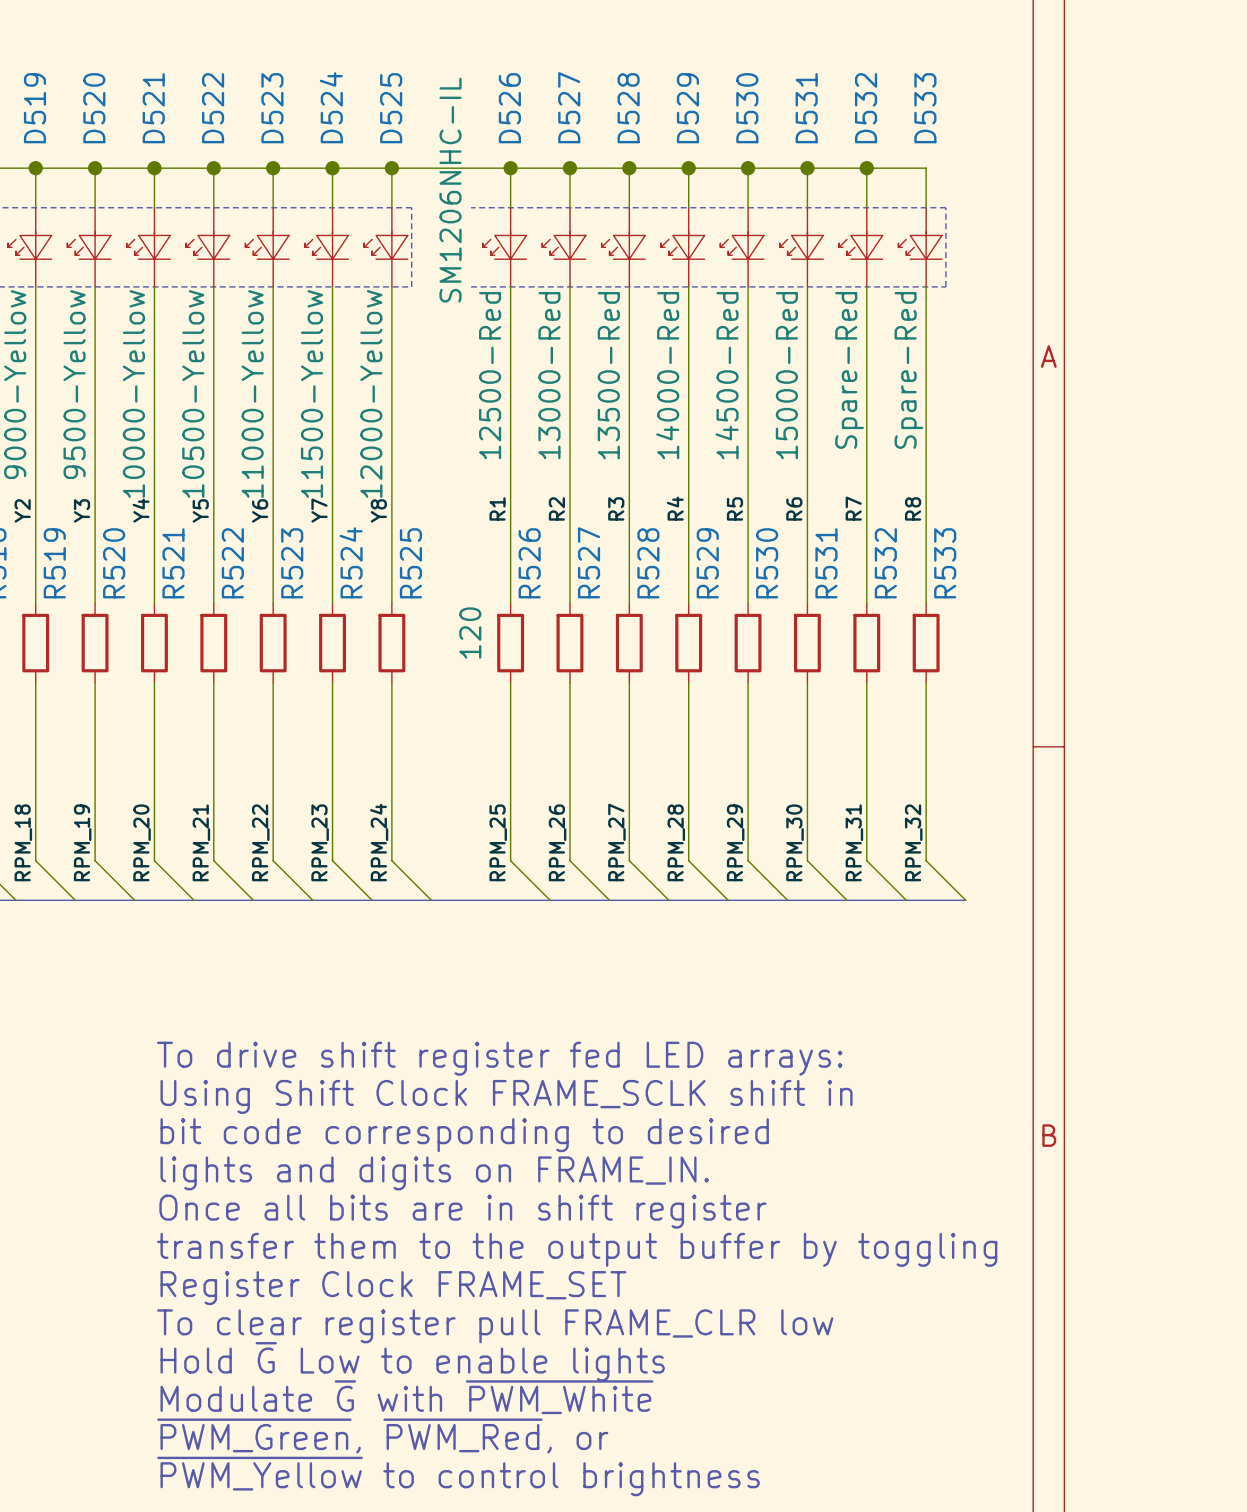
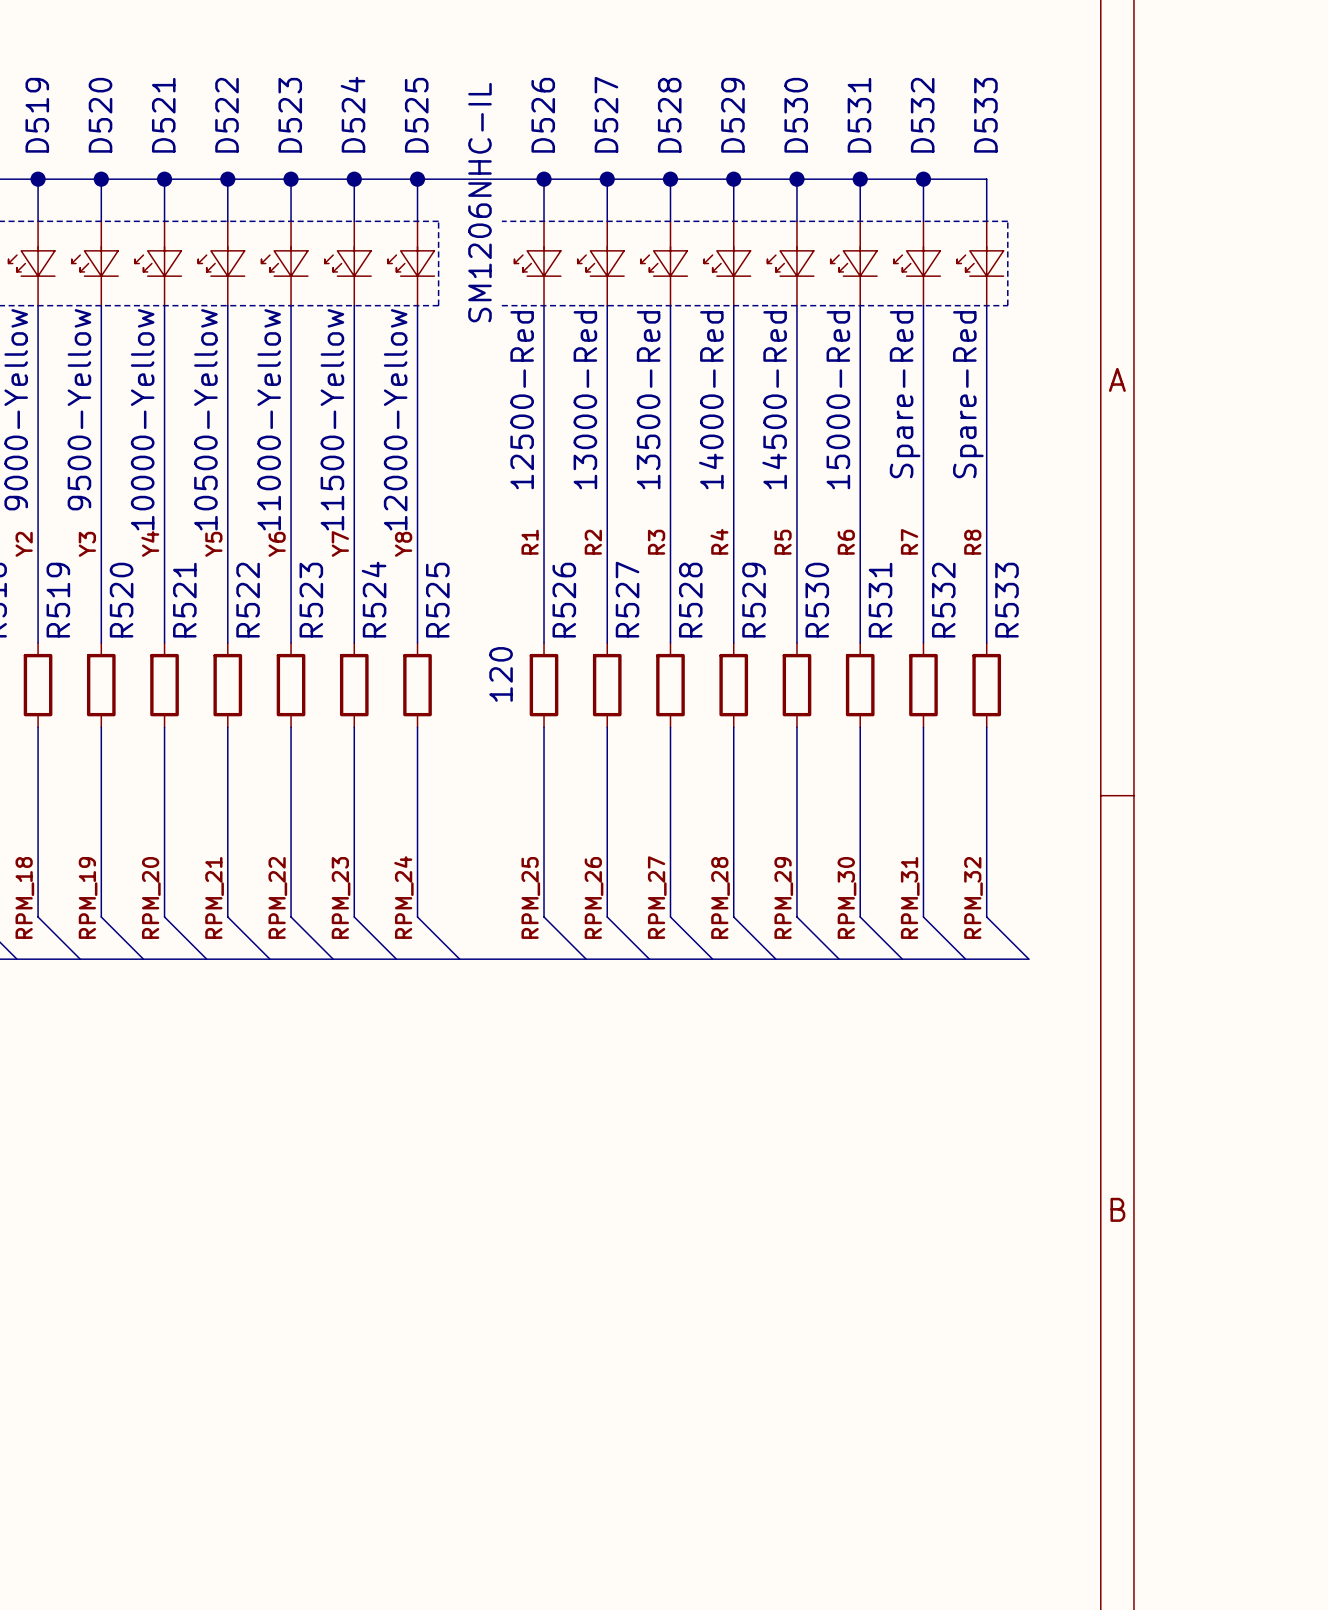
text: To drive shift register fed LED arrays: (499, 1058) -> none
text: Using Shift Clock FRAME_SCLK shift in (506, 1096) -> none
text: bit code corresponding to desired (464, 1135) -> none
text: lights and digits on FRAME_IN. (434, 1173) -> none
text: Once all bits are in shift register (462, 1211) -> none
text: transfer them to the output buffer by toggling (577, 1249) -> none
text: Register Clock FRAME_SET (393, 1288) -> none
text: To clear register pull FRAME_CLR low (495, 1326) -> none
text: Hold ~{G} Low to enable lights (412, 1361) -> none
text: Modulate ~{G} with ~{PWM_White} (406, 1397) -> none
text: ~{PWM_Green}, ~{PWM_Red}, or (382, 1435) -> none
text: ~{PWM_Yellow} to control brightness (458, 1476) -> none

